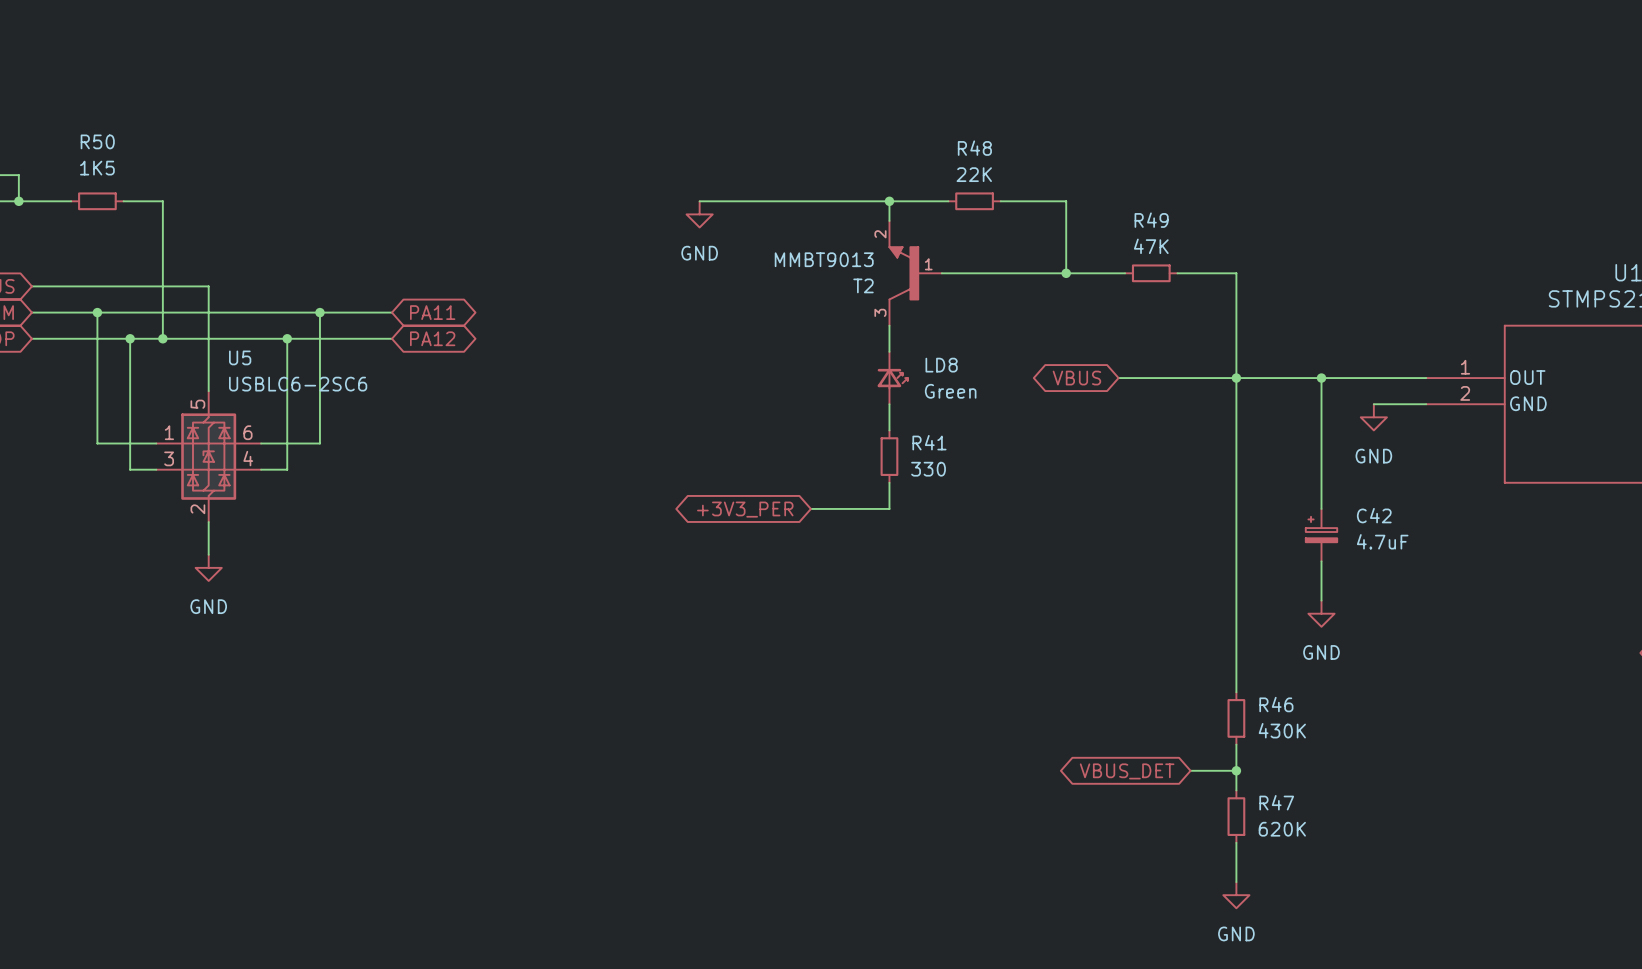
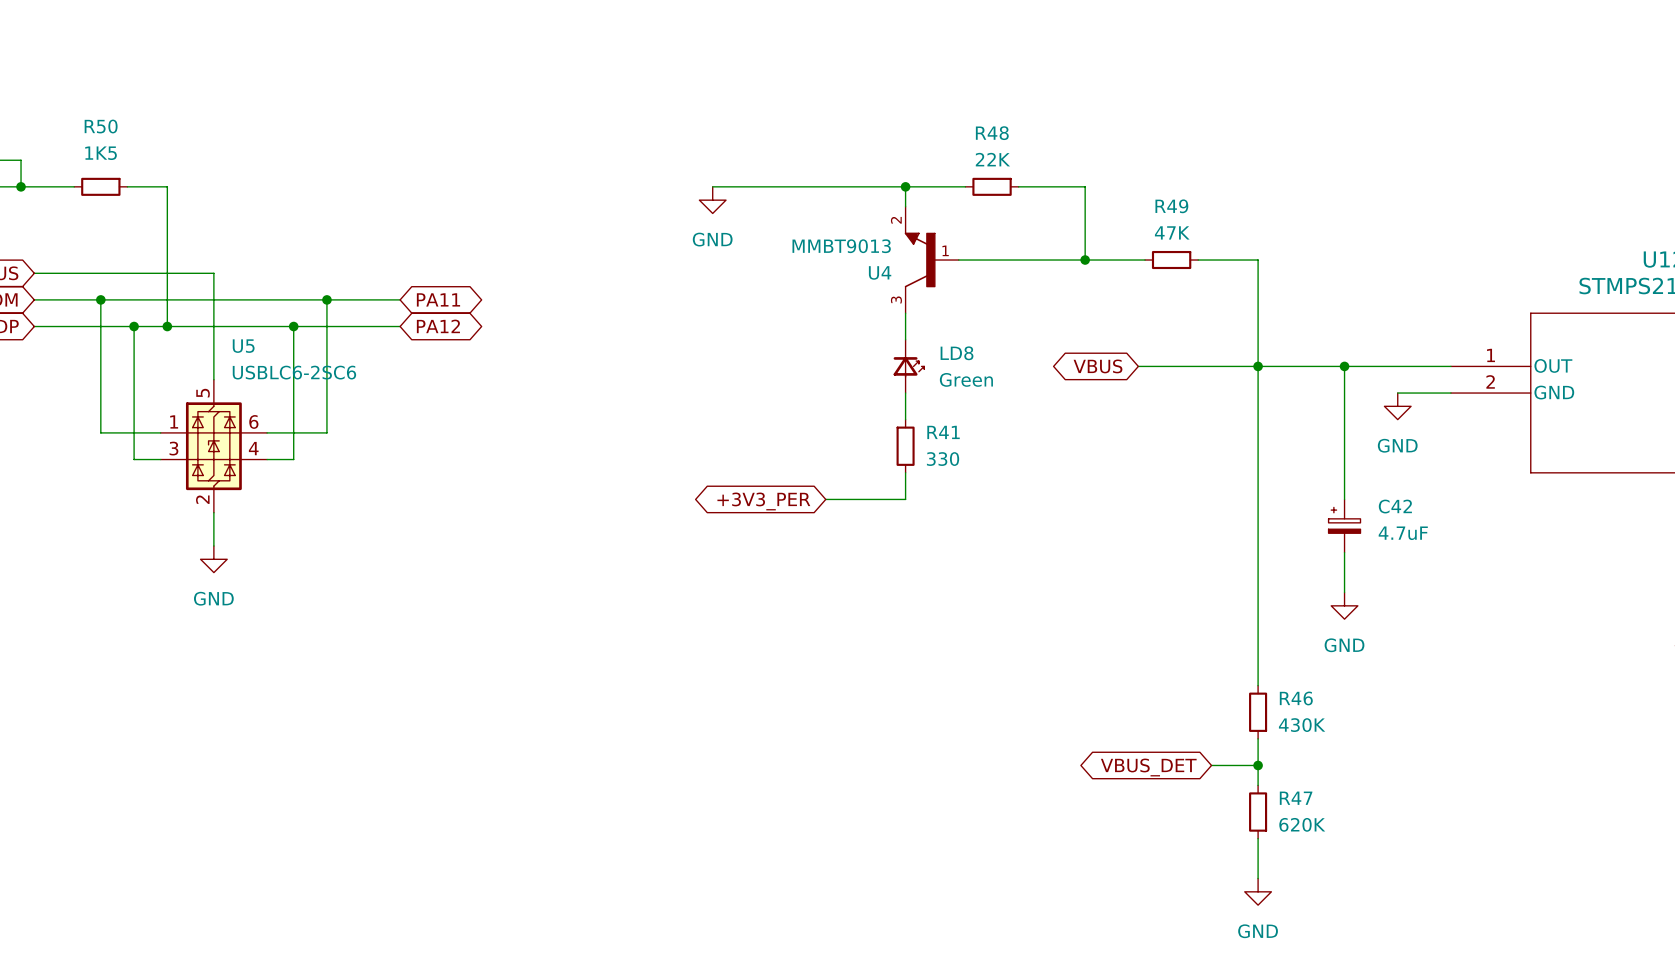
T2 name: T2 (863, 285) -> U4 (880, 272)

